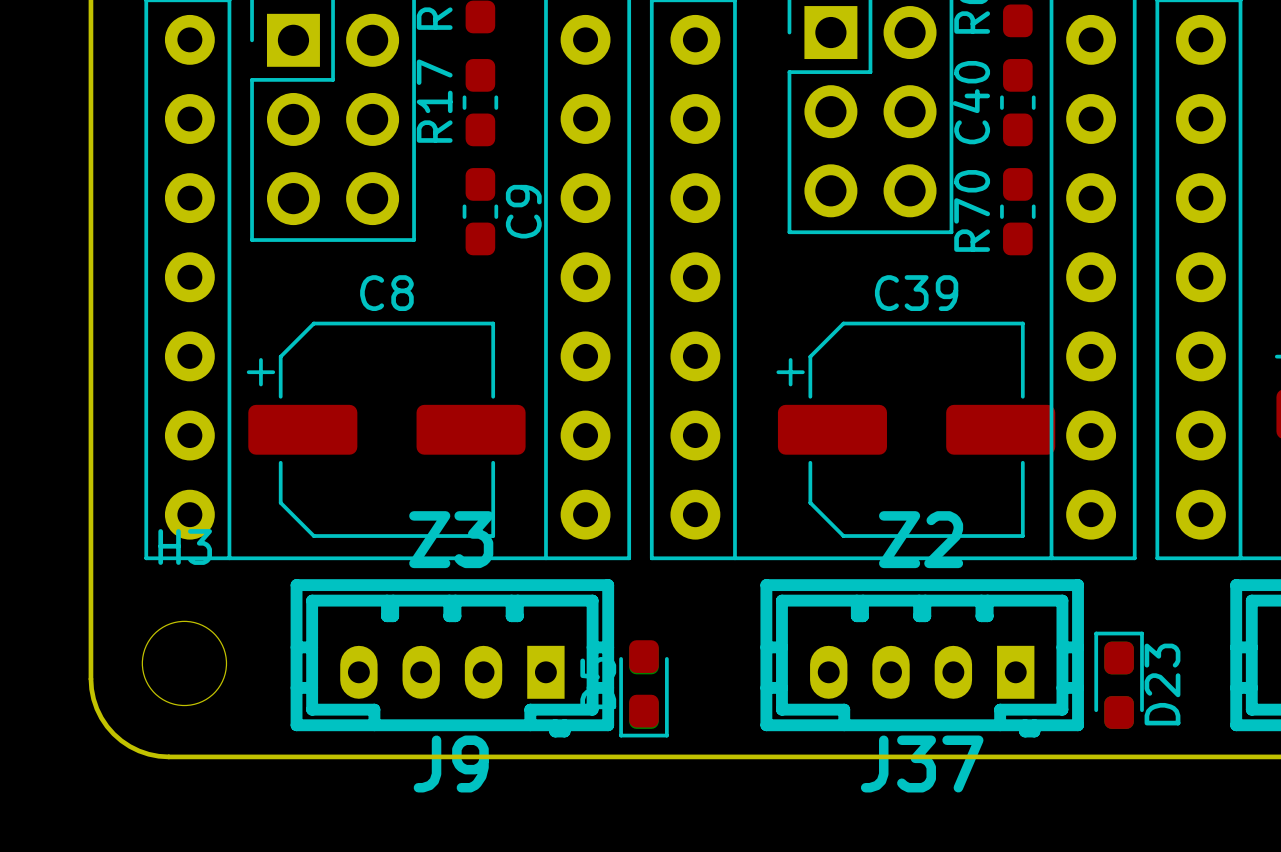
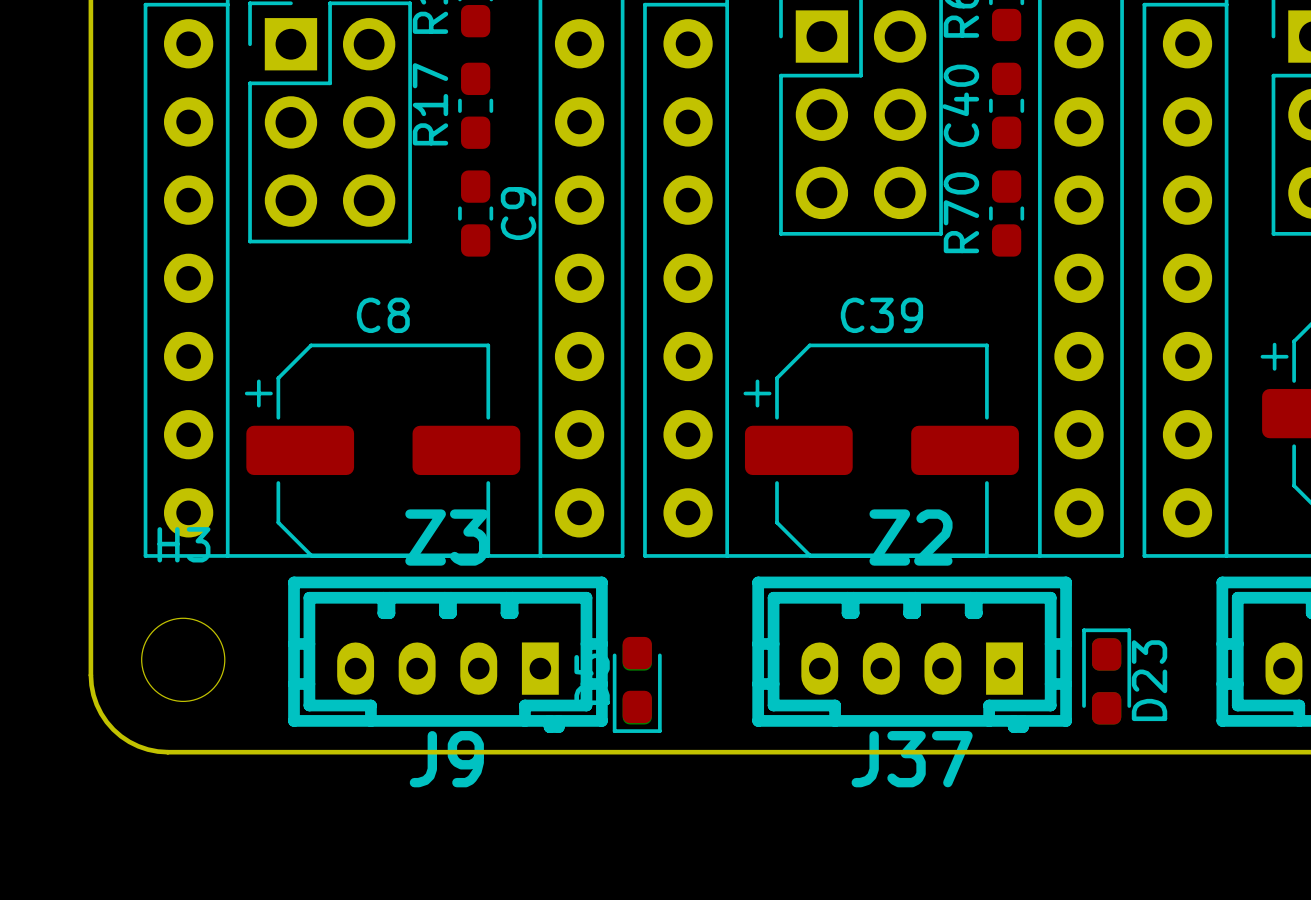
C8 name position: C8 (386, 293) -> C8 (383, 315)
C8 footprint: [246, 321, 526, 538] -> [244, 343, 521, 558]
C39 footprint: [776, 321, 1056, 538] -> [743, 343, 1019, 558]

